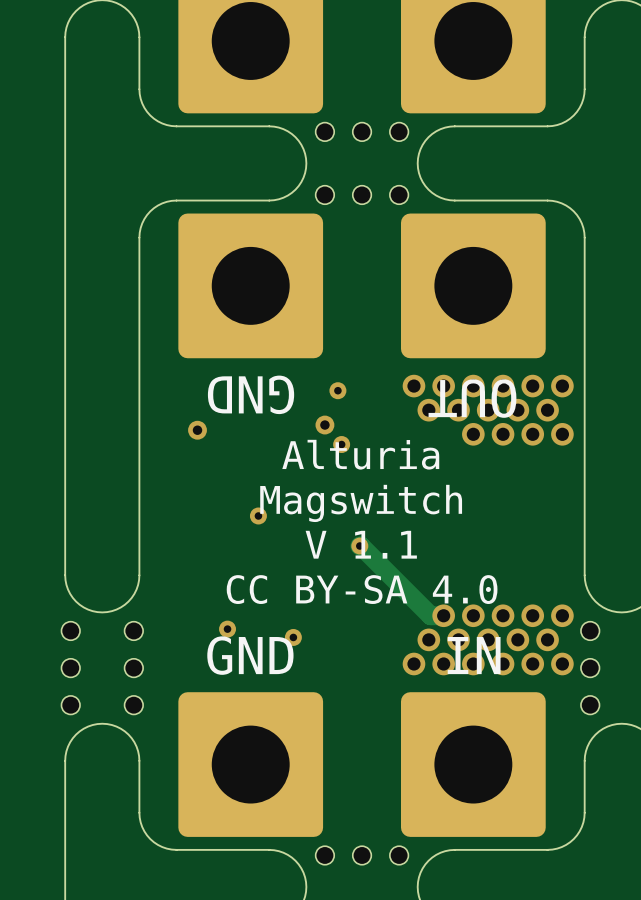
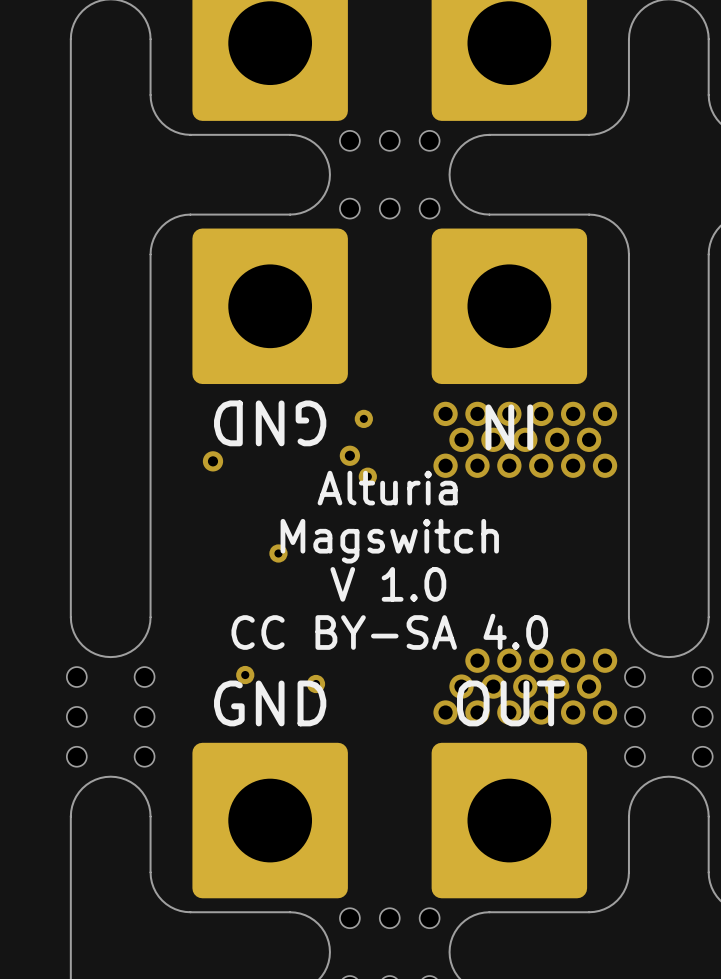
text: OUT (472, 398) -> IN (509, 427)
via: none -> (445, 465)
via: none -> (477, 465)
text: V 1.1 (361, 544) -> V 1.0 (388, 584)
track: (359, 546) (430, 615) (443, 615) -> none
via: (359, 546) -> none
text: IN (474, 655) -> OUT (511, 703)

